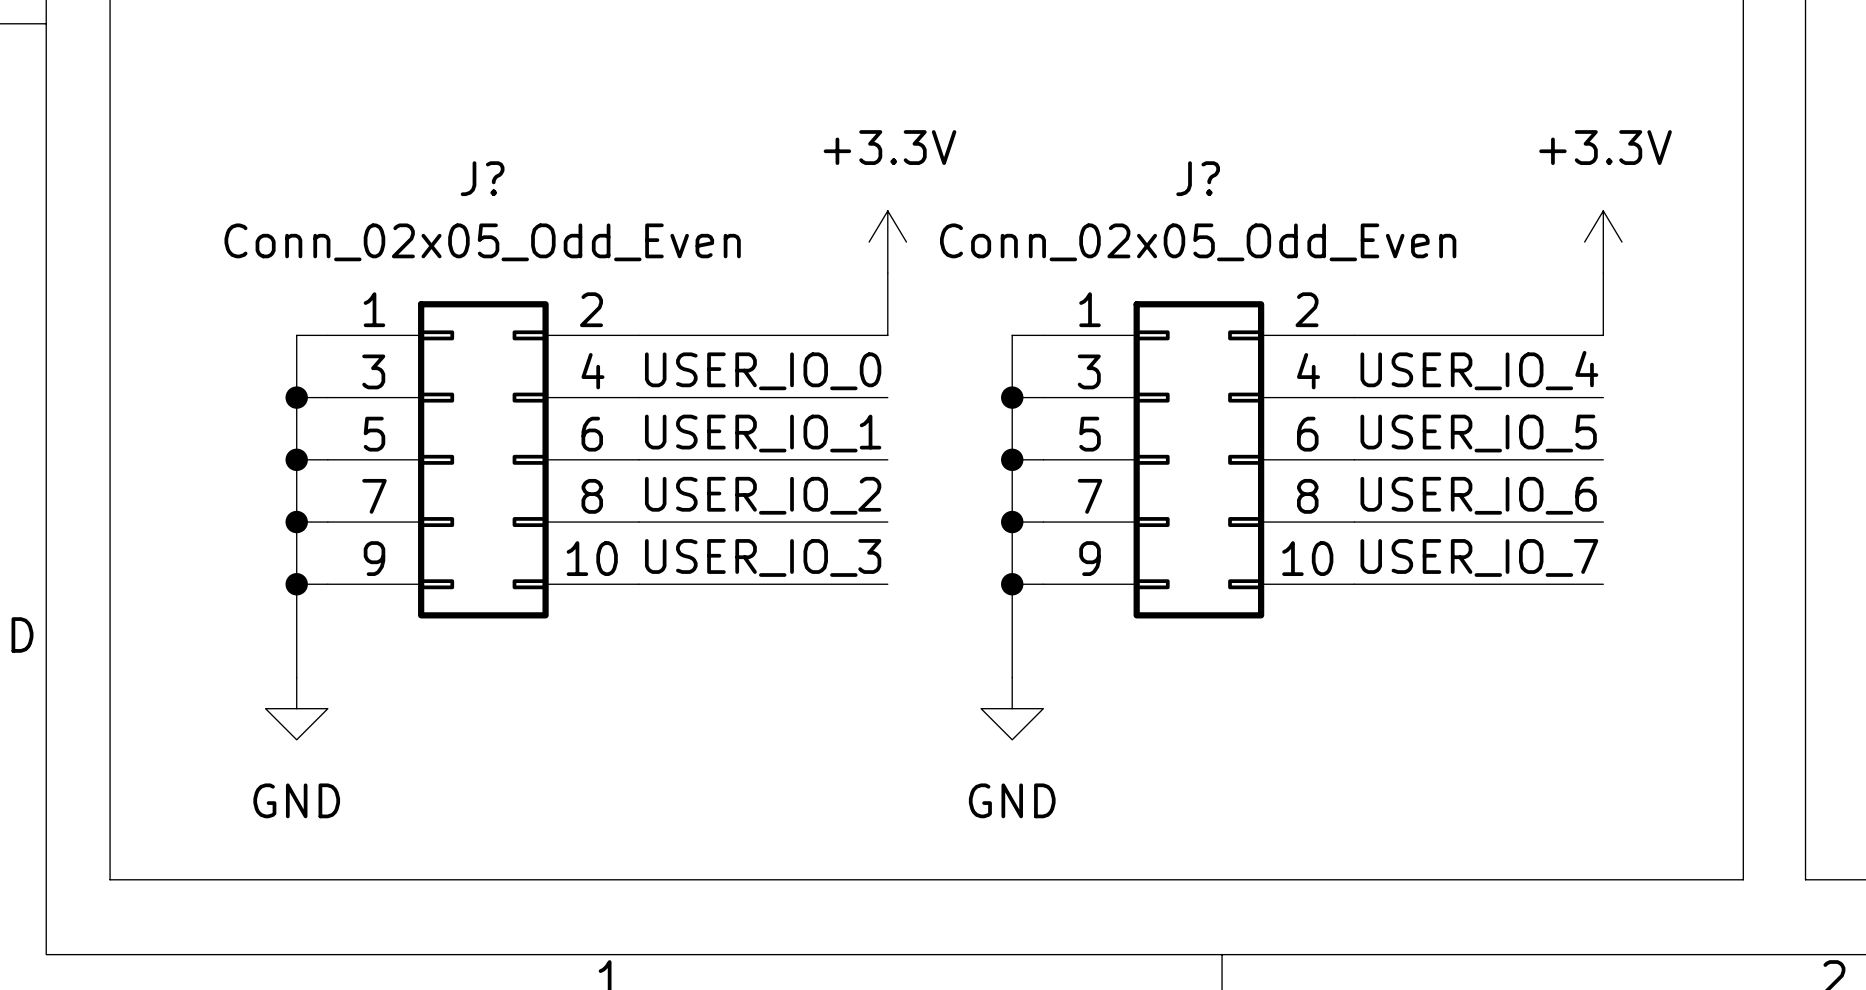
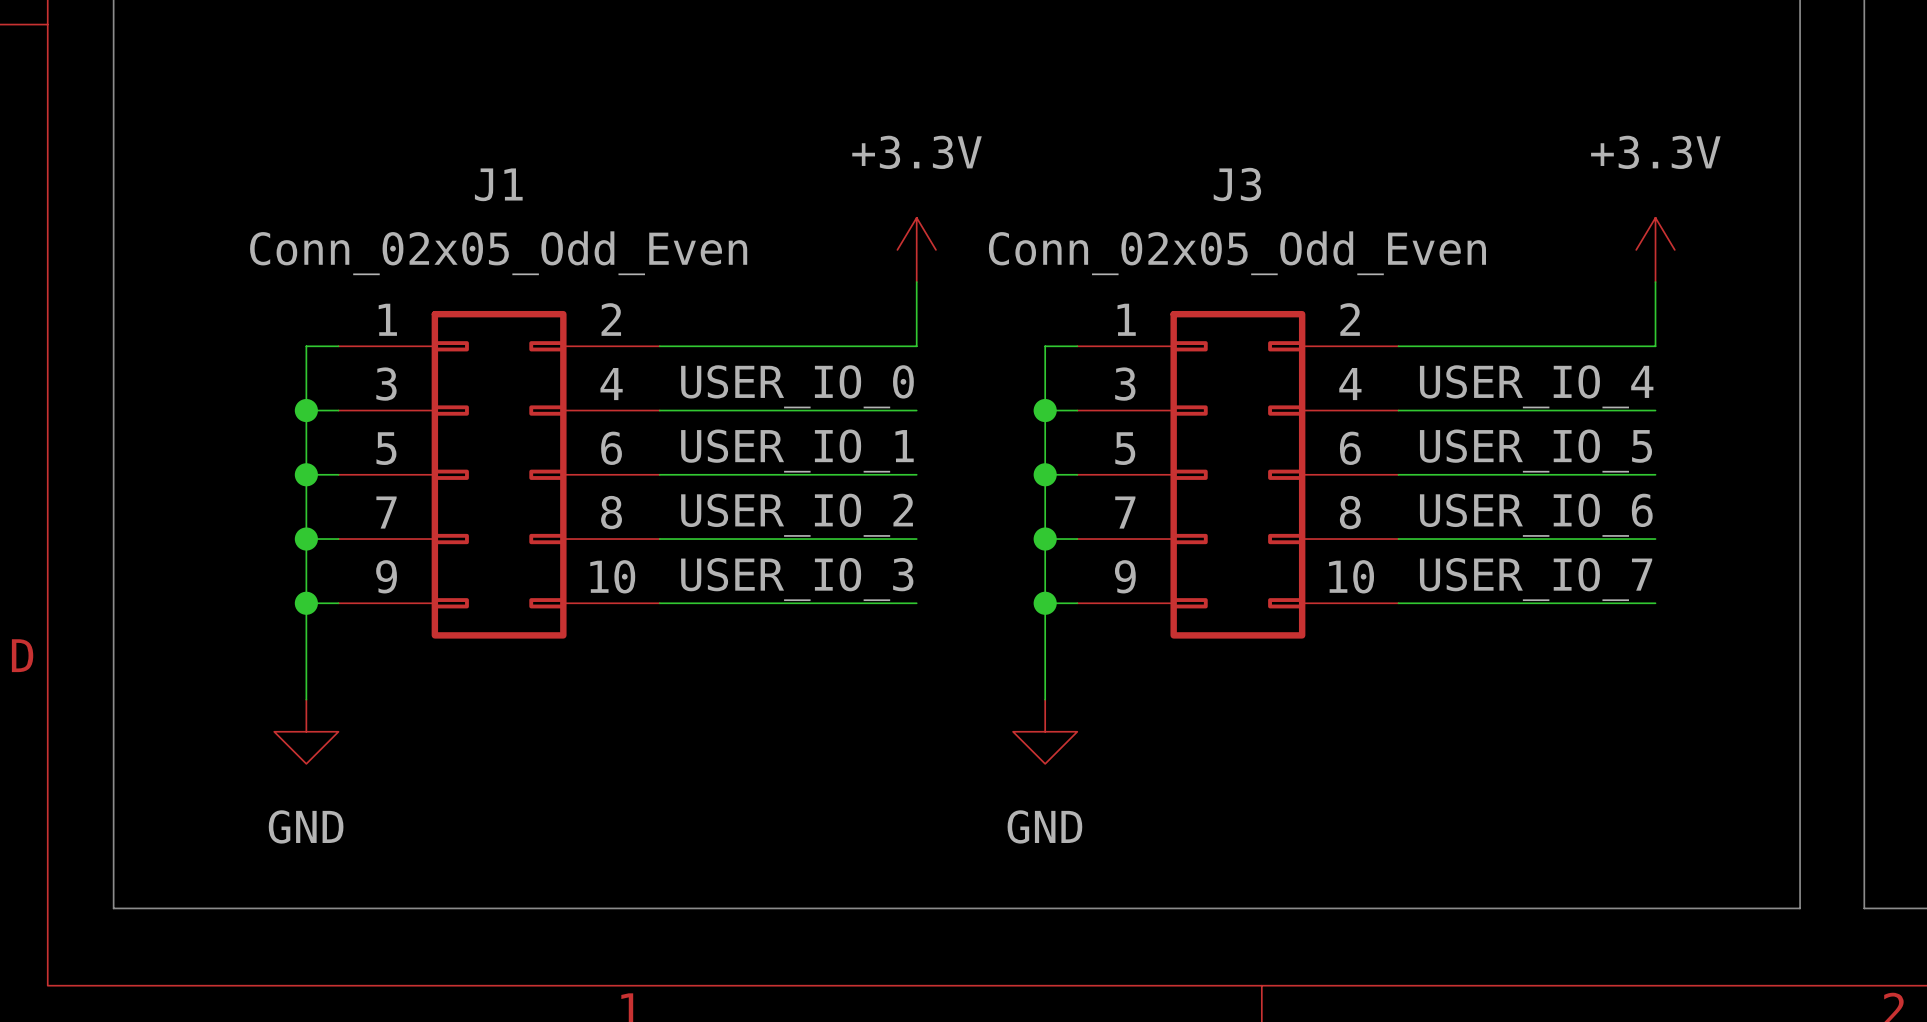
J? name: J? (482, 178) -> J1 (498, 184)
J? name: J? (1198, 178) -> J3 (1237, 184)

